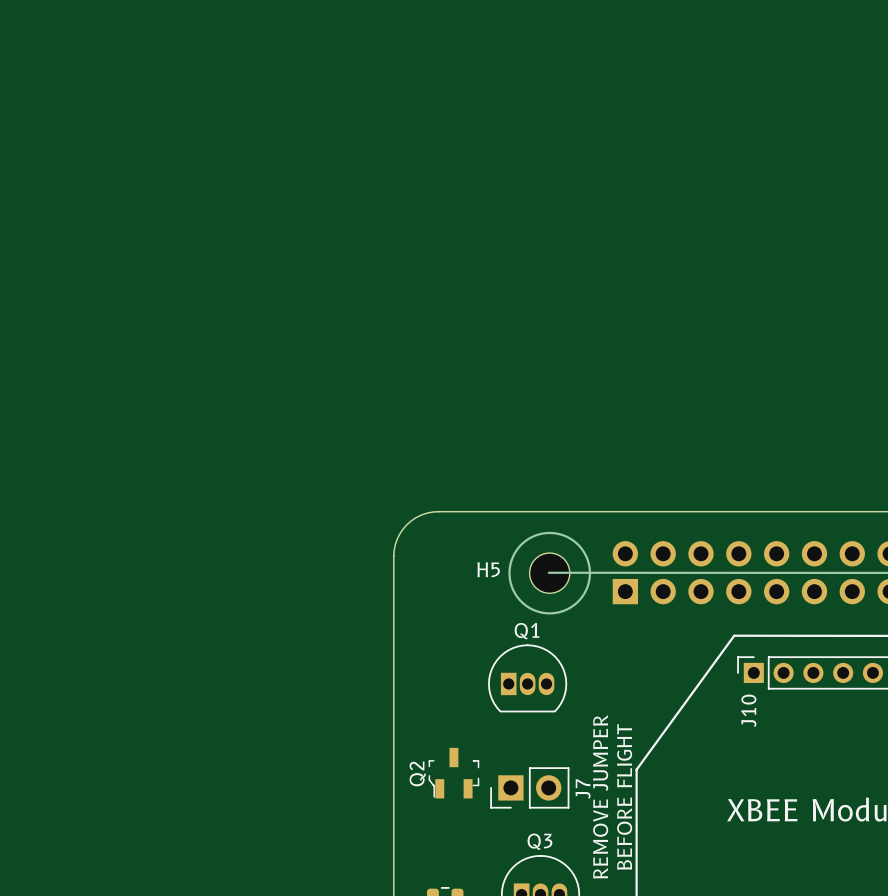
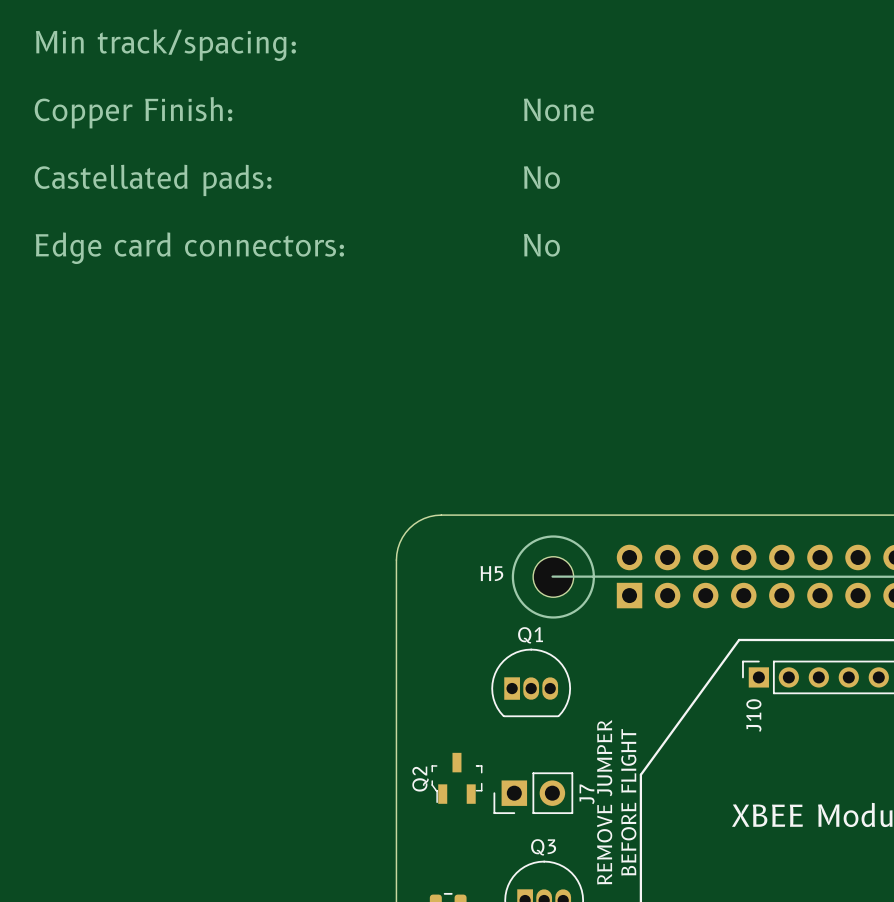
text: none -> Min track/spacing: (165, 45)
text: none -> None (558, 109)
text: none -> Copper Finish: (133, 112)
text: none -> No (541, 177)
text: none -> Castellated pads: (153, 180)
text: none -> No (541, 245)
text: none -> Edge card connectors: (189, 248)

